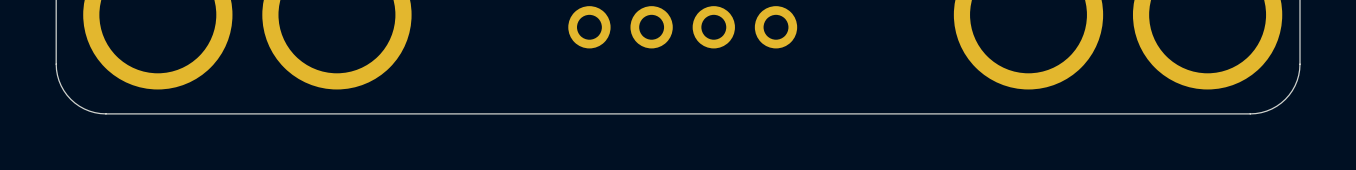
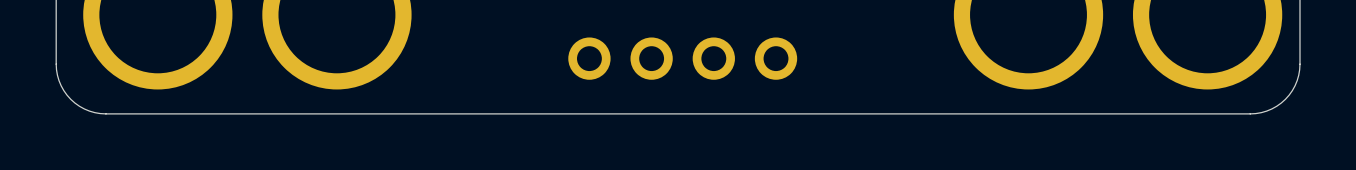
part position: (682, 27) -> (682, 58)

